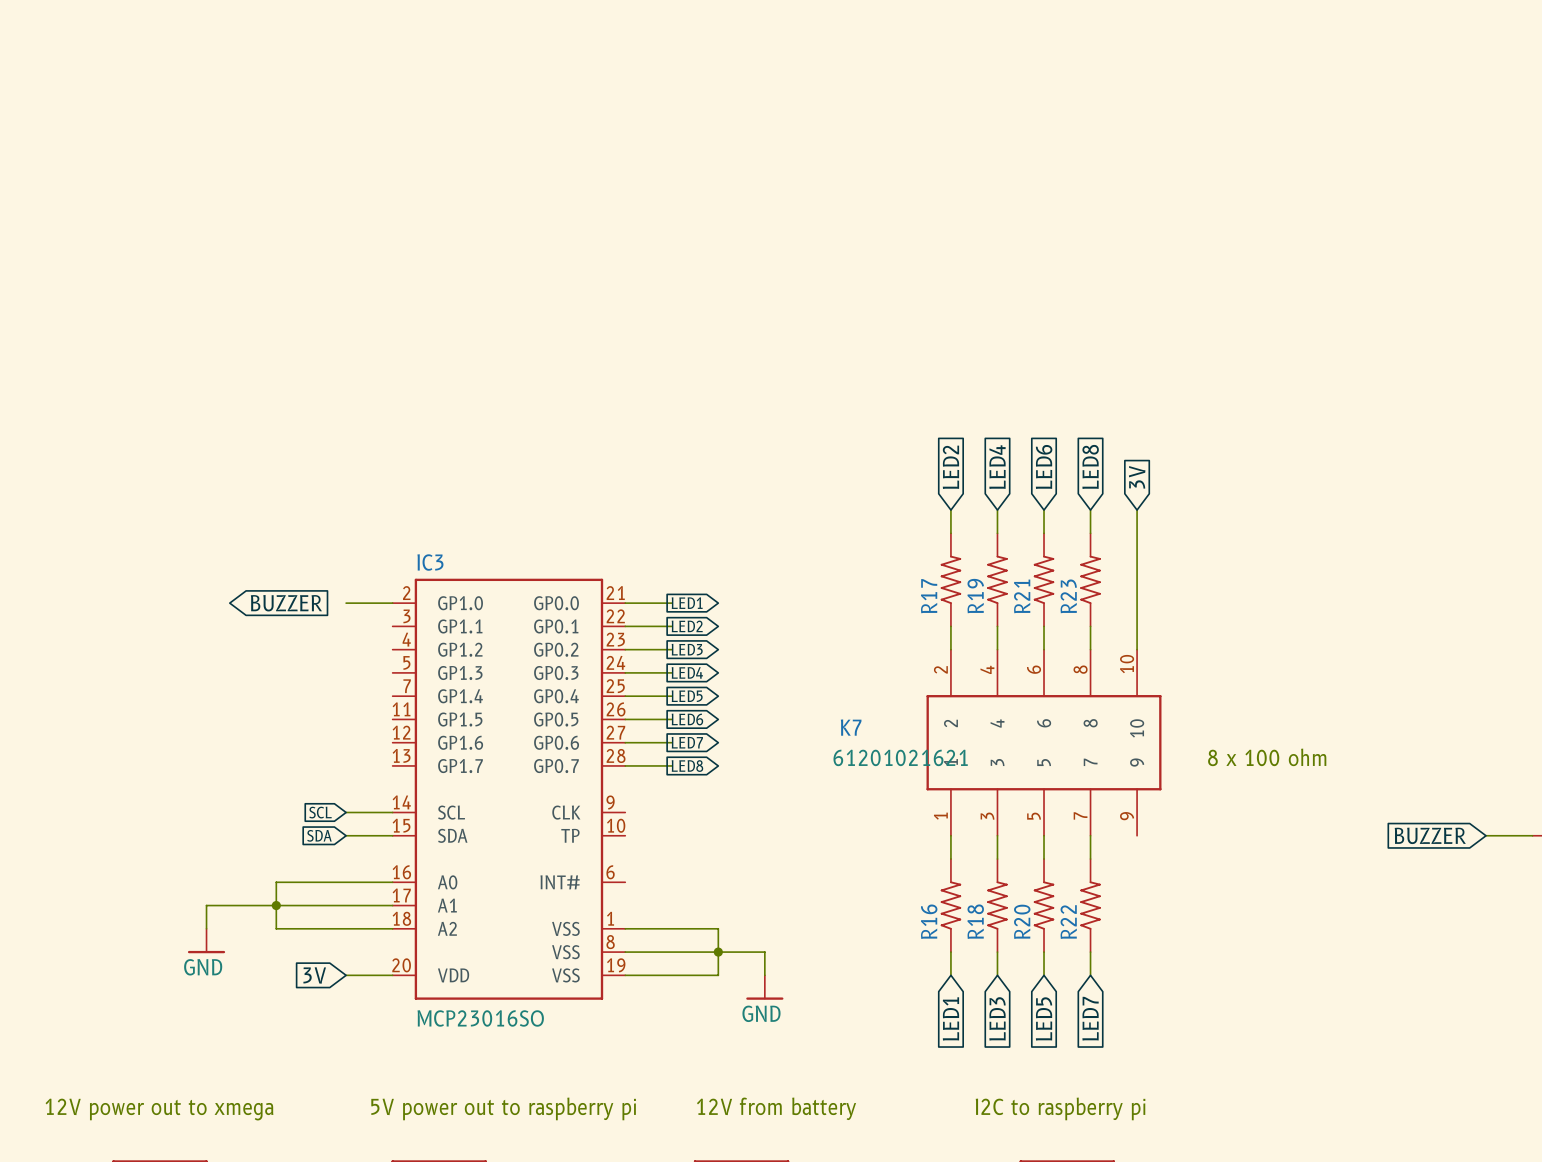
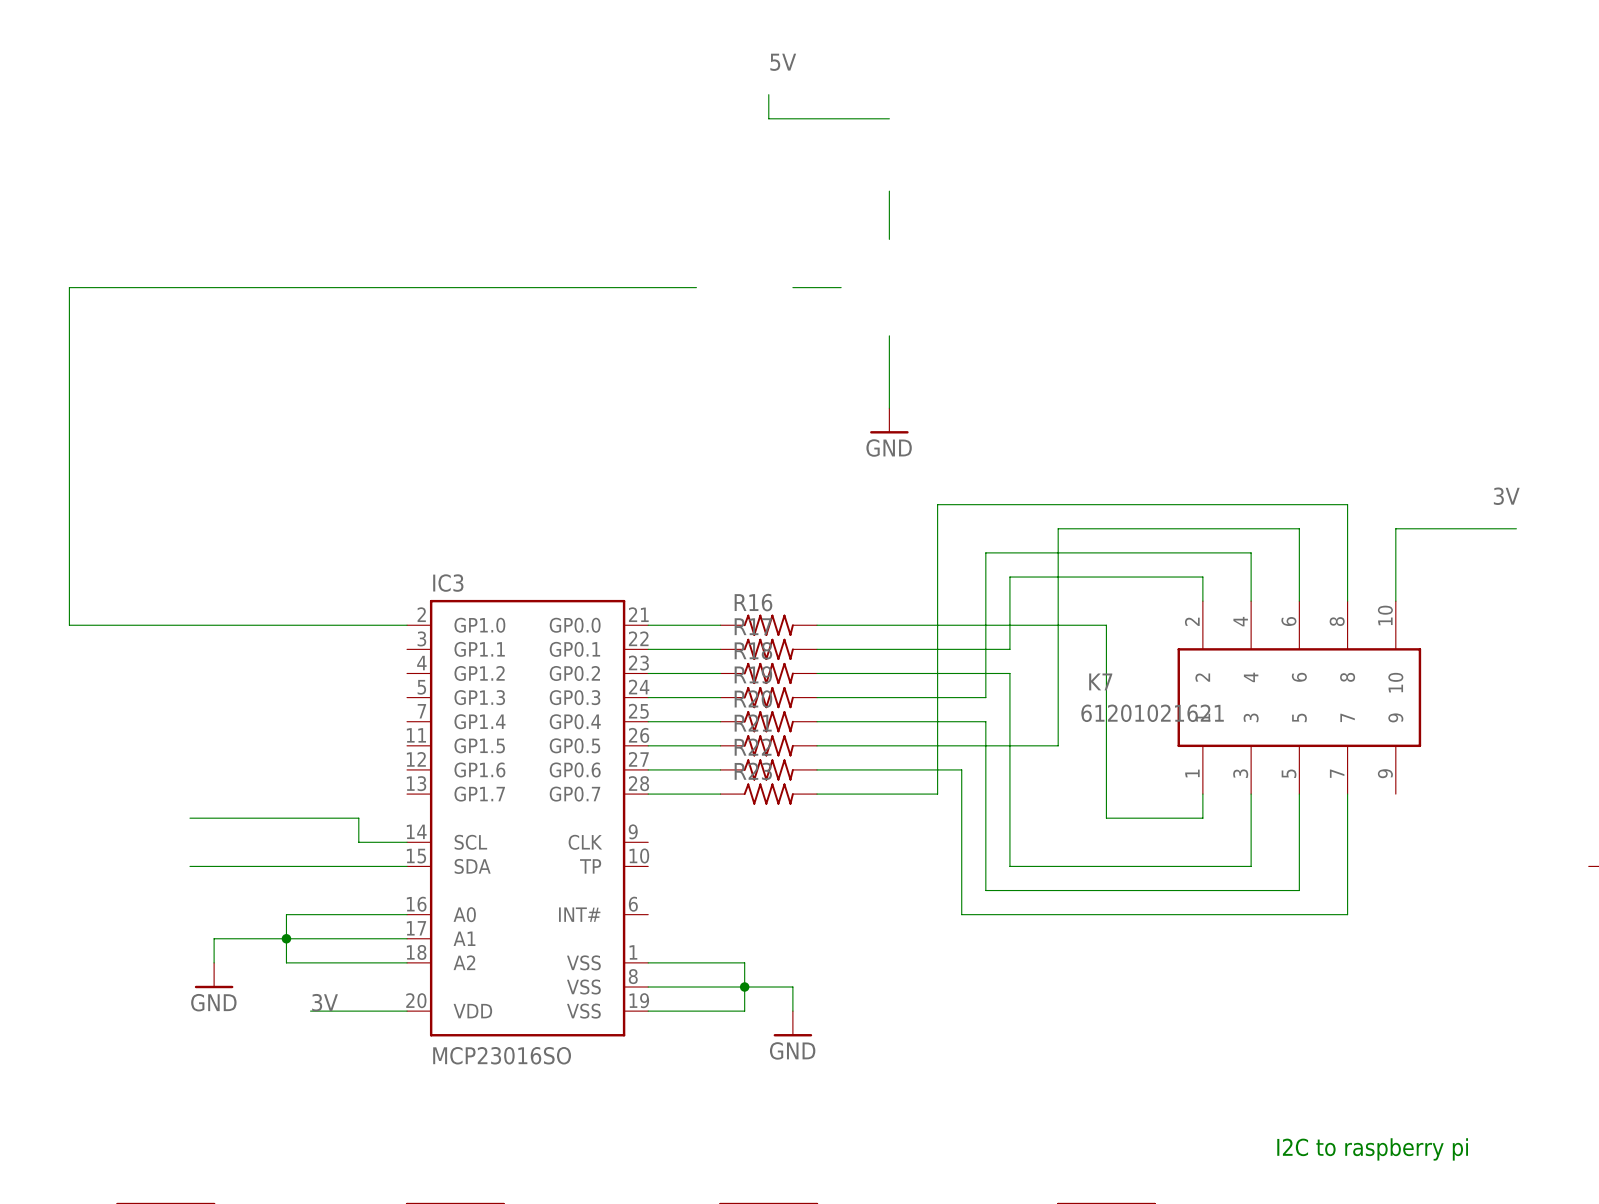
label: none -> 5V (783, 62)
wire: none -> (768, 94) (768, 118) (889, 118)
wire: none -> (889, 191) (889, 239)
wire: none -> (696, 287) (69, 287) (69, 625) (358, 625)
wire: none -> (792, 287) (841, 287)
wire: none -> (889, 335) (889, 408)
power symbol: none -> GND (889, 420)
global label: LED6 (1044, 466) -> none
global label: LED8 (1090, 466) -> none
global label: LED2 (950, 467) -> none
global label: LED4 (997, 467) -> none
global label: 3V (1137, 477) -> none
label: none -> 3V (1506, 496)
wire: (950, 510) (950, 533) -> none
wire: (997, 510) (997, 533) -> none
wire: (1044, 510) (1044, 533) -> none
wire: (1090, 510) (1090, 533) -> none
wire: (1137, 510) (1137, 649) -> none
wire: none -> (1516, 528) (1395, 528) (1395, 601)
R17 rotation: 0° (950, 579) -> 90° clockwise (768, 649)
R17 position: (950, 579) -> (768, 649)
R19 rotation: 0° (997, 579) -> 90° clockwise (768, 697)
R19 position: (997, 579) -> (768, 697)
R21 rotation: 0° (1044, 579) -> 90° clockwise (768, 745)
R21 position: (1044, 579) -> (768, 745)
R23 rotation: 0° (1090, 579) -> 90° clockwise (768, 794)
R23 position: (1090, 579) -> (768, 794)
wire: none -> (1202, 601) (1202, 577) (1009, 577) (1009, 649) (817, 649)
wire: none -> (1251, 601) (1251, 552) (985, 552) (985, 649)
wire: none -> (1299, 601) (1299, 528) (1058, 528) (1058, 745) (817, 745)
wire: none -> (1347, 601) (1347, 504) (937, 504) (937, 794) (817, 794)
global label: BUZZER (286, 603) -> none
wire: none -> (696, 625) (720, 625)
global label: LED1 (687, 603) -> none
wire: none -> (817, 625) (1106, 625) (1106, 818) (1202, 818) (1202, 794)
wire: none -> (696, 649) (720, 649)
global label: LED2 (687, 626) -> none
wire: (997, 626) (997, 649) -> none
wire: (1044, 626) (1044, 649) -> none
wire: (1090, 626) (1090, 649) -> none
wire: none -> (696, 673) (720, 673)
global label: LED3 (687, 649) -> none
wire: none -> (817, 673) (1009, 673) (1009, 866) (1251, 866) (1251, 794)
wire: none -> (985, 673) (985, 697) (817, 697)
wire: none -> (696, 697) (720, 697)
global label: LED4 (687, 672) -> none
wire: none -> (696, 721) (720, 721)
global label: LED5 (687, 696) -> none
wire: none -> (817, 721) (985, 721) (985, 866)
wire: none -> (696, 745) (720, 745)
global label: LED6 (687, 719) -> none
wire: none -> (696, 769) (720, 769)
global label: LED7 (687, 742) -> none
wire: none -> (817, 769) (961, 769) (961, 914) (1347, 914) (1347, 794)
K7 position: (1044, 742) -> (1299, 697)
text: 8 x 100 ohm (1267, 757) -> none
wire: none -> (696, 794) (720, 794)
wire: none -> (1299, 794) (1299, 890) (985, 890)
global label: LED8 (687, 766) -> none
wire: none -> (189, 818) (358, 818) (358, 842)
global label: SCL (320, 812) -> none
wire: none -> (189, 866) (358, 866)
global label: SDA (319, 835) -> none
wire: (997, 835) (997, 859) -> none
wire: (1044, 835) (1044, 859) -> none
wire: (1090, 835) (1090, 859) -> none
global label: BUZZER (1430, 835) -> none
wire: (1486, 835) (1532, 835) -> none
R16 rotation: 0° (950, 905) -> 90° clockwise (768, 625)
R16 position: (950, 905) -> (768, 625)
R18 rotation: 0° (997, 905) -> 90° clockwise (768, 673)
R18 position: (997, 905) -> (768, 673)
R20 rotation: 0° (1044, 905) -> 90° clockwise (768, 721)
R20 position: (1044, 905) -> (768, 721)
R22 rotation: 0° (1090, 905) -> 90° clockwise (768, 769)
R22 position: (1090, 905) -> (768, 769)
wire: (950, 952) (950, 975) -> none
wire: (997, 952) (997, 975) -> none
wire: (1044, 952) (1044, 975) -> none
wire: (1090, 952) (1090, 975) -> none
label: none -> 3V (325, 1002)
wire: none -> (310, 1011) (358, 1011)
global label: 3V (314, 975) -> none
global label: LED1 (950, 1018) -> none
global label: LED3 (997, 1018) -> none
global label: LED5 (1044, 1018) -> none
global label: LED7 (1090, 1018) -> none
text: 5V power out to raspberry pi (503, 1108) -> none
text: 12V from battery (776, 1108) -> none
text: I2C to raspberry pi (1060, 1108) -> none
text: none -> I2C to raspberry pi (1372, 1149)
text: 12V power out to xmega (159, 1109) -> none

